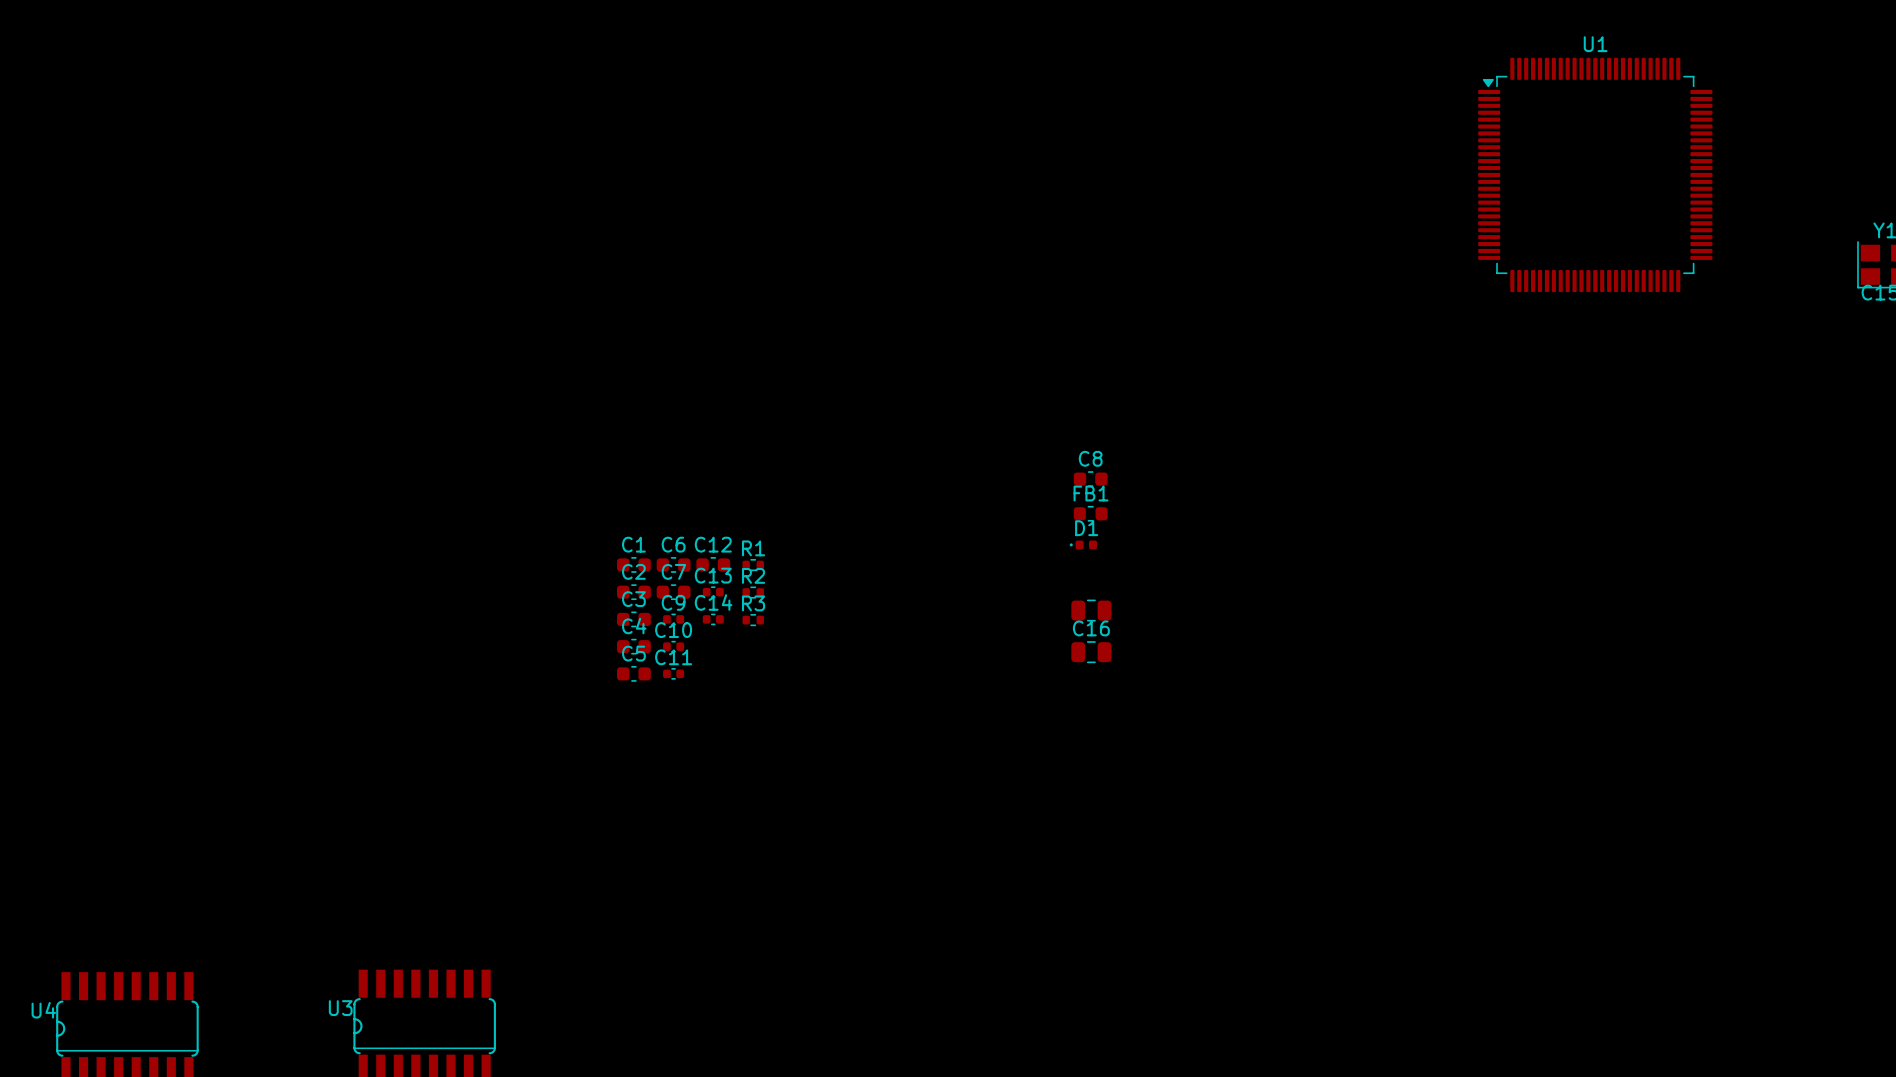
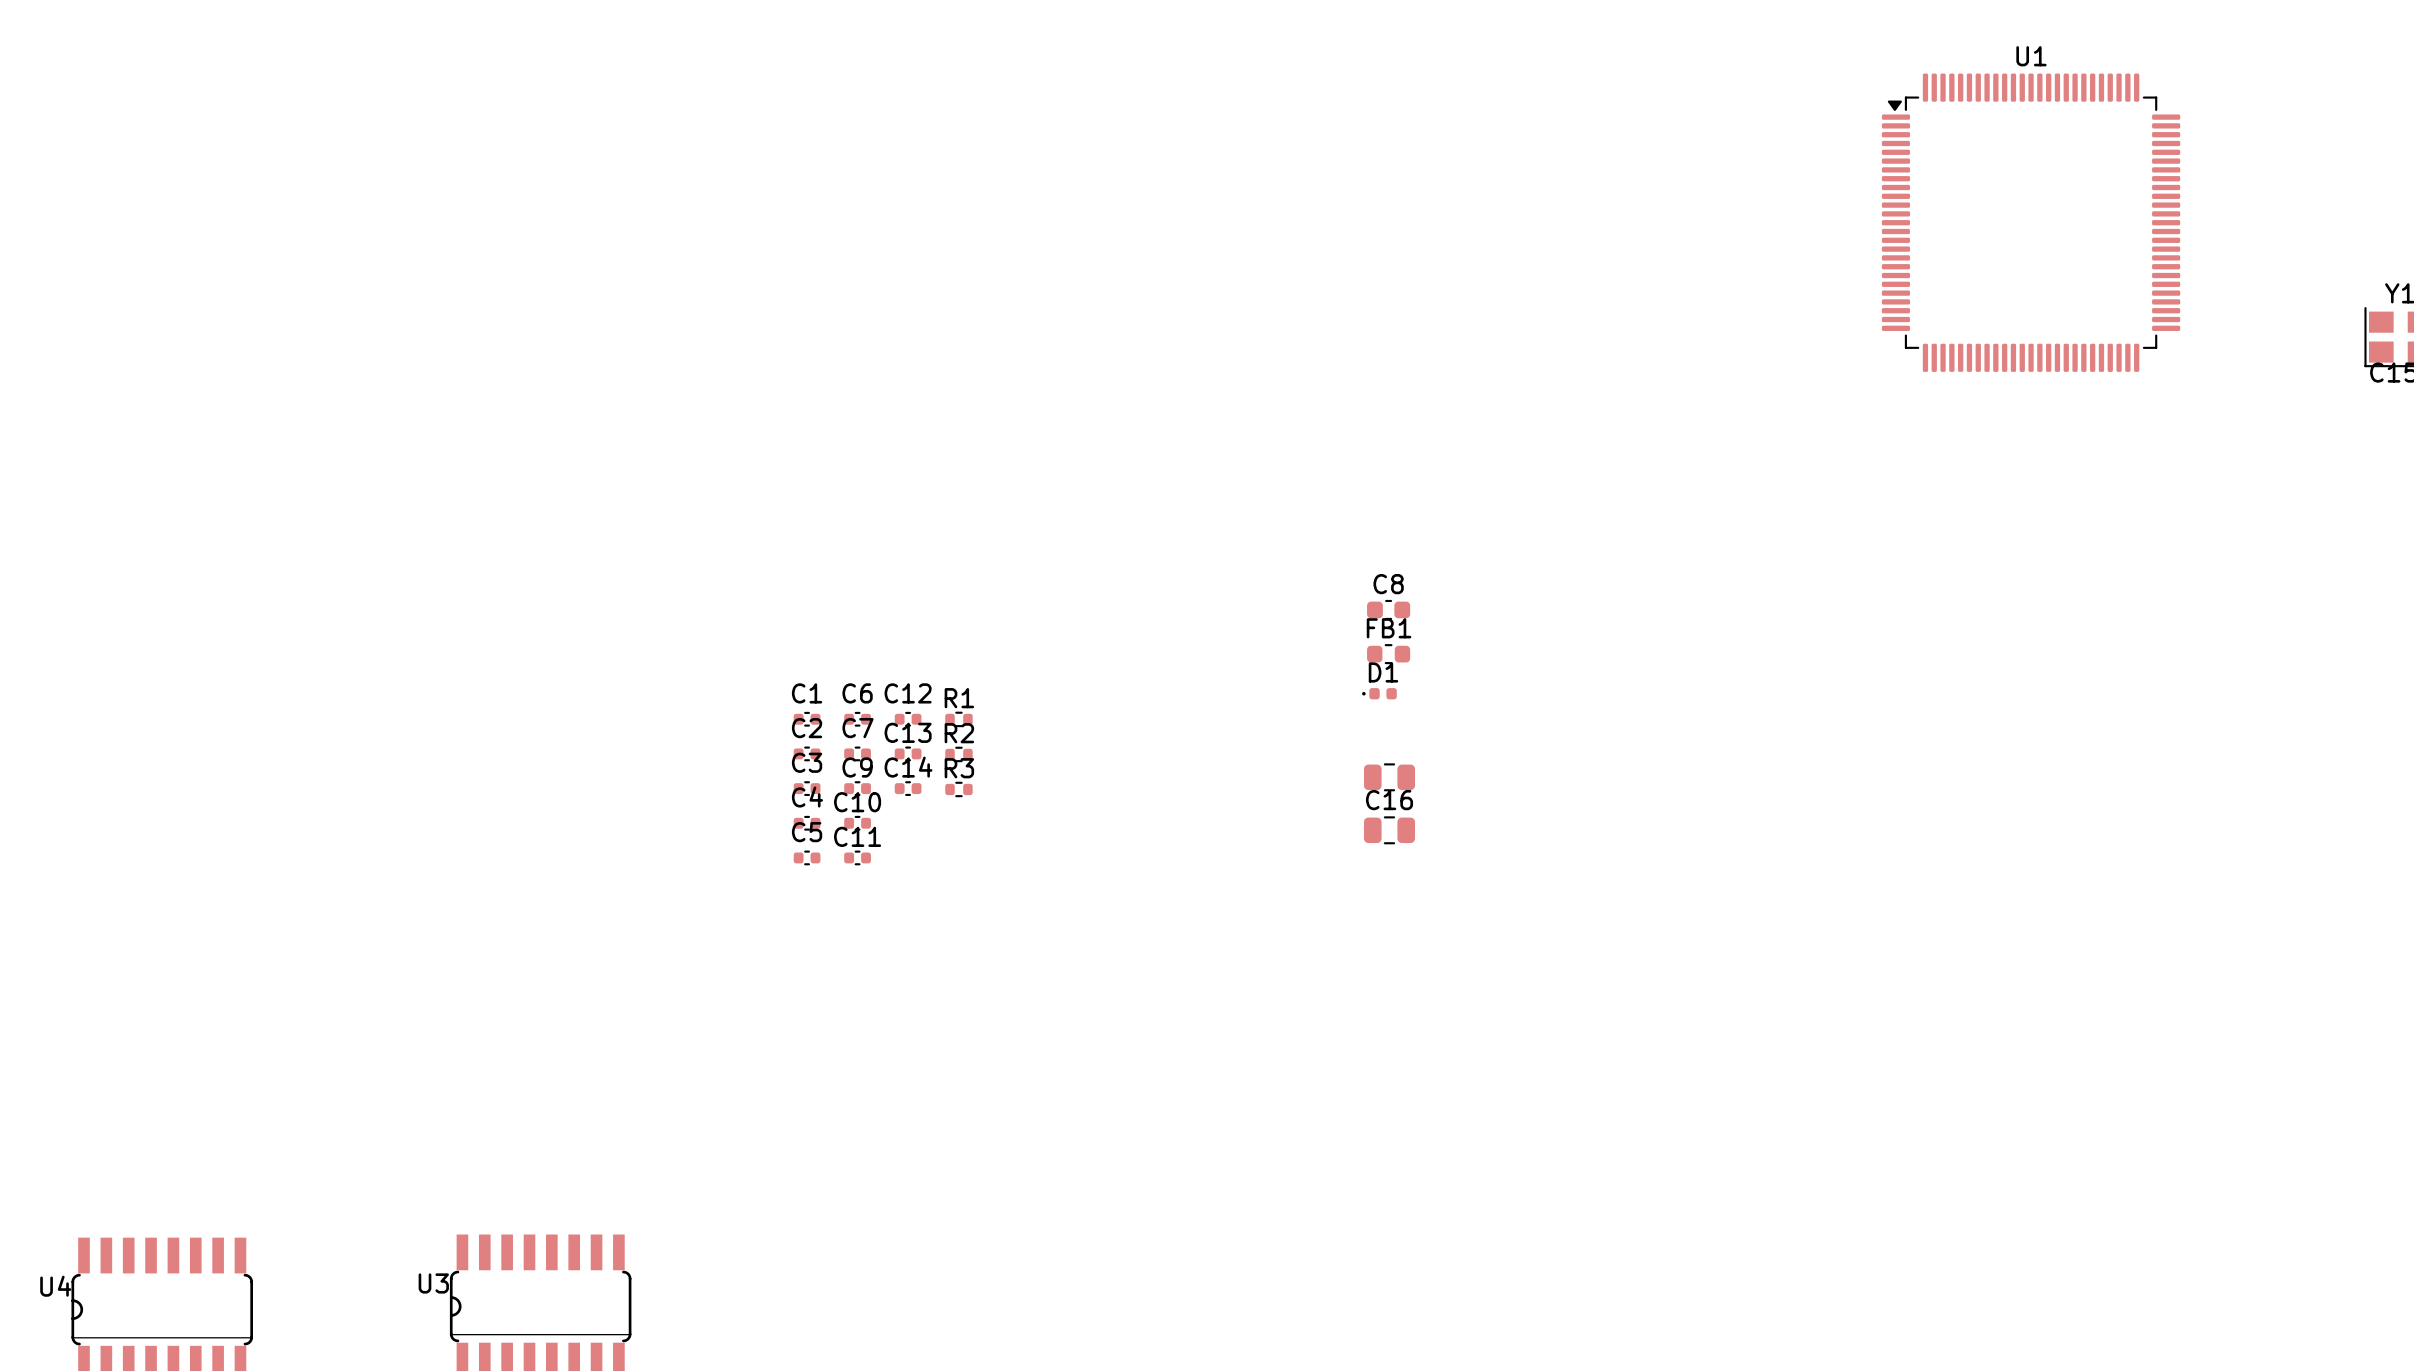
C1 footprint: [616, 557, 651, 573] -> [793, 711, 821, 727]
C6 footprint: [656, 557, 691, 573] -> [844, 711, 871, 727]
C12 footprint: [696, 557, 731, 573] -> [894, 711, 922, 727]
C2 footprint: [616, 584, 651, 601] -> [793, 746, 821, 762]
C7 footprint: [656, 584, 691, 601] -> [844, 746, 871, 762]
C3 footprint: [616, 611, 651, 628] -> [793, 781, 821, 796]
C4 footprint: [616, 638, 651, 655] -> [793, 815, 821, 831]
C5 footprint: [616, 665, 651, 682] -> [793, 850, 821, 866]

